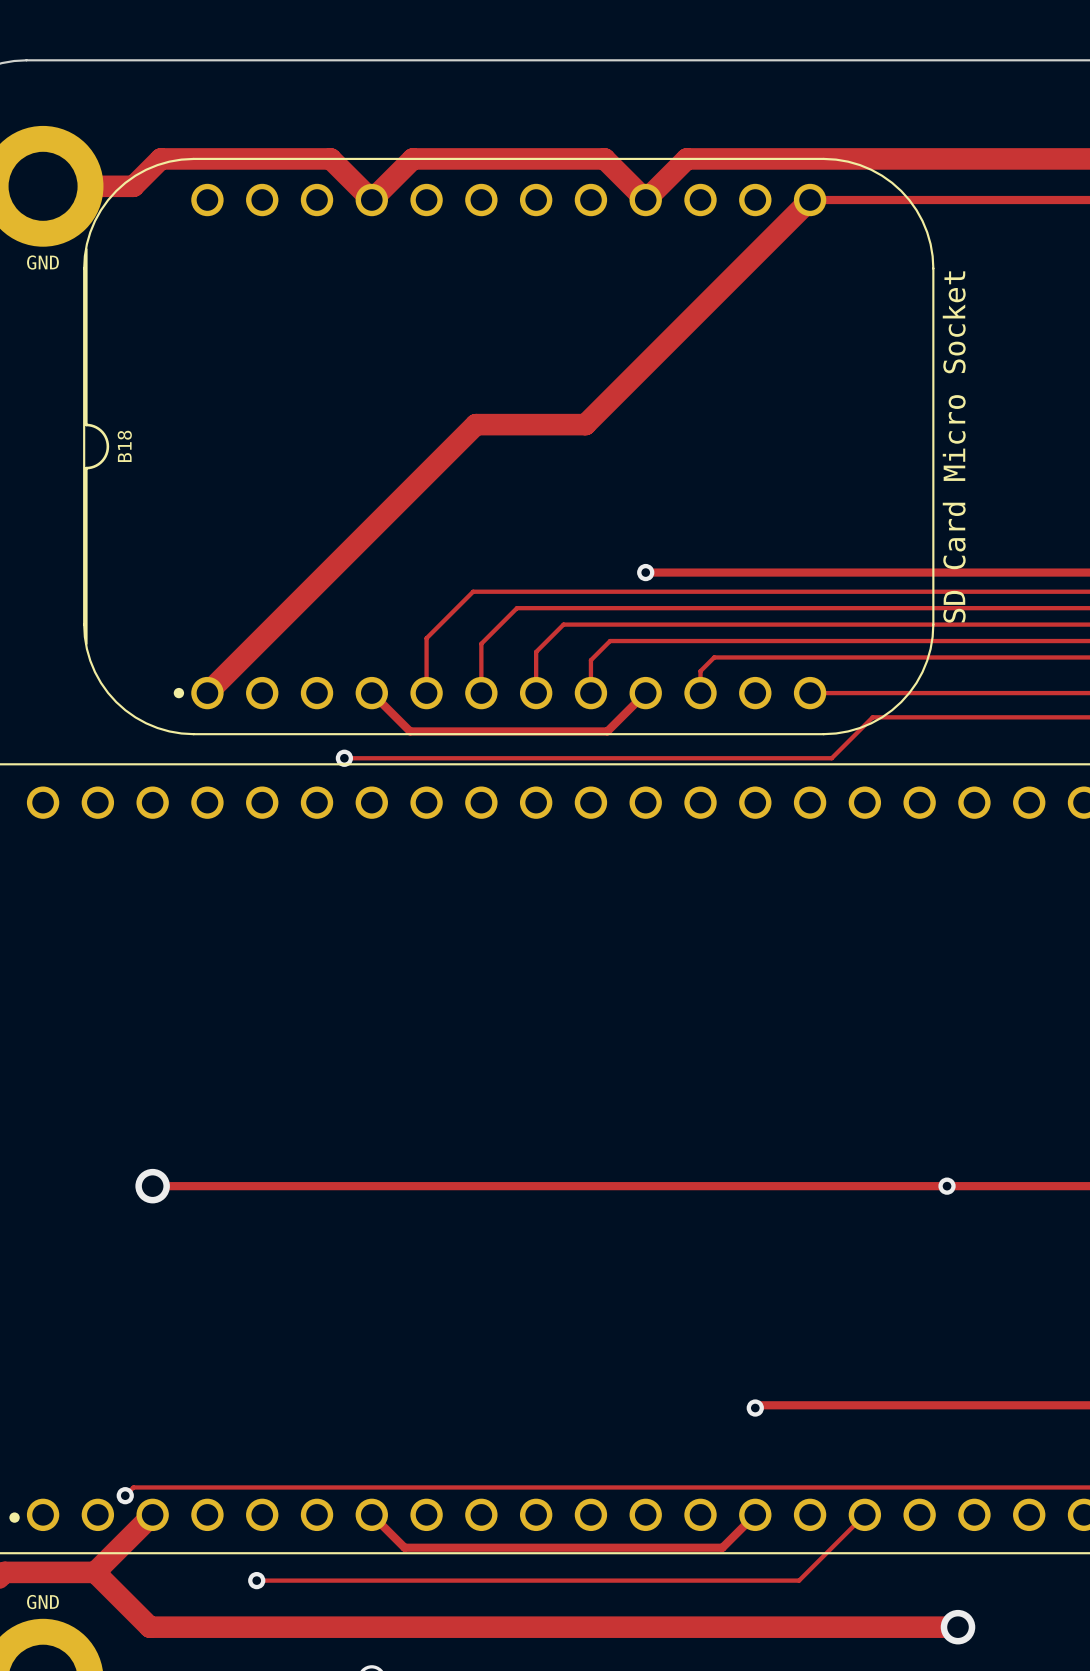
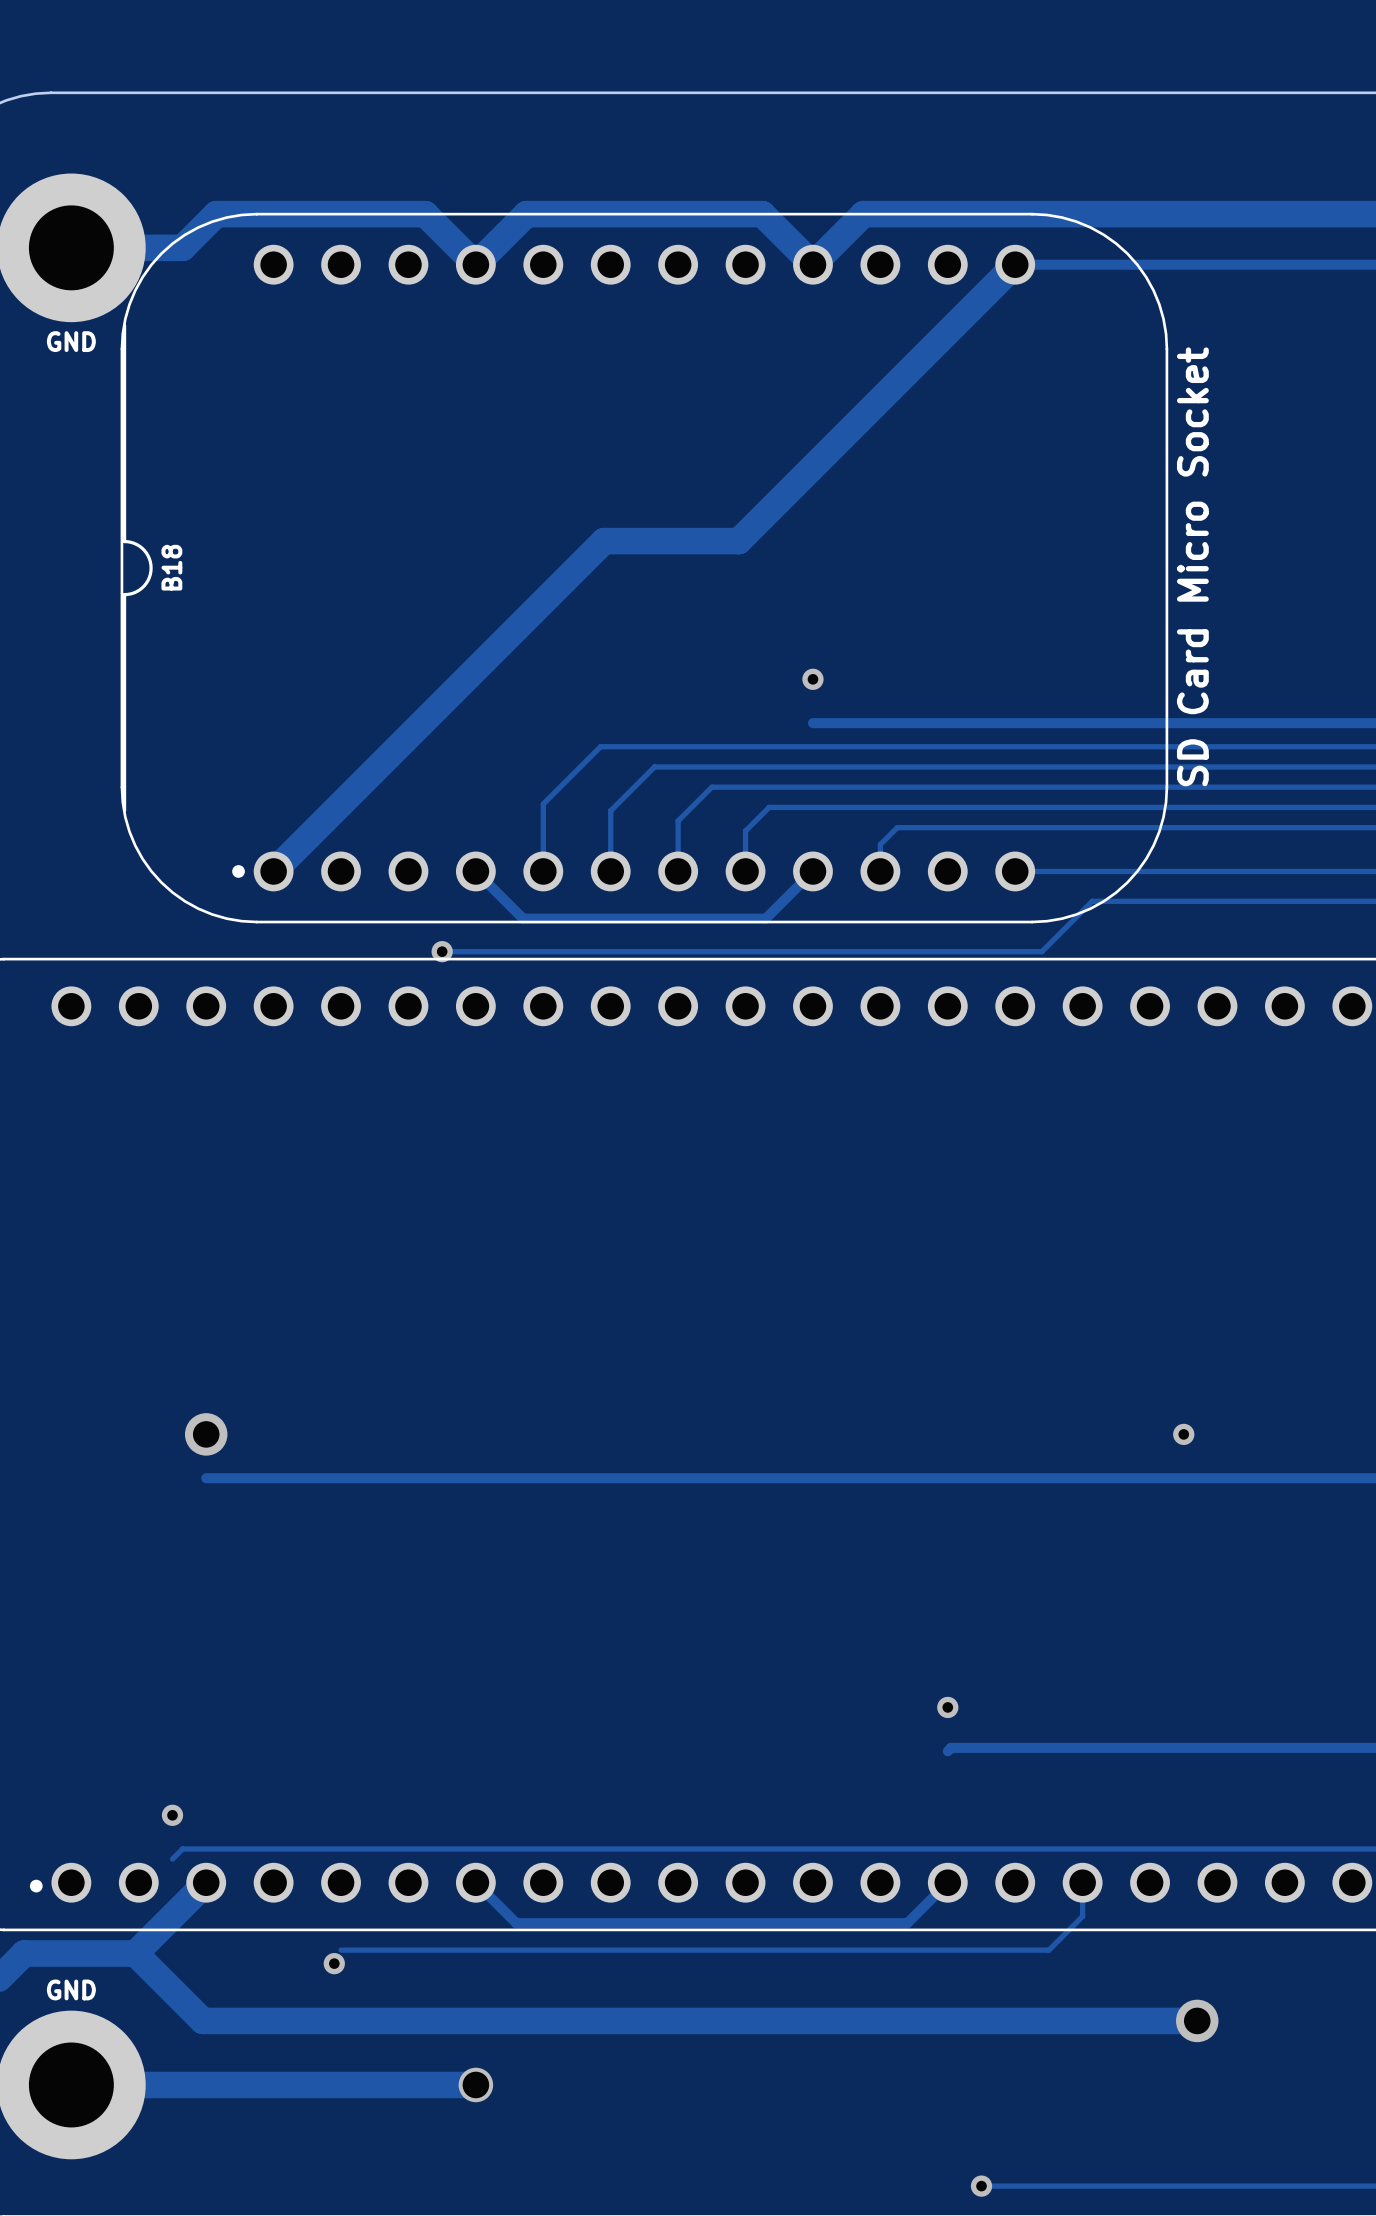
via position: (645, 572) -> (812, 679)
via position: (152, 1186) -> (206, 1434)
via position: (947, 1186) -> (1183, 1434)
via position: (755, 1408) -> (947, 1707)
via position: (125, 1495) -> (172, 1815)
track: (864, 1514) (799, 1580) (256, 1580) -> (1082, 1882) (1082, 1916) (1048, 1950) (341, 1950)

